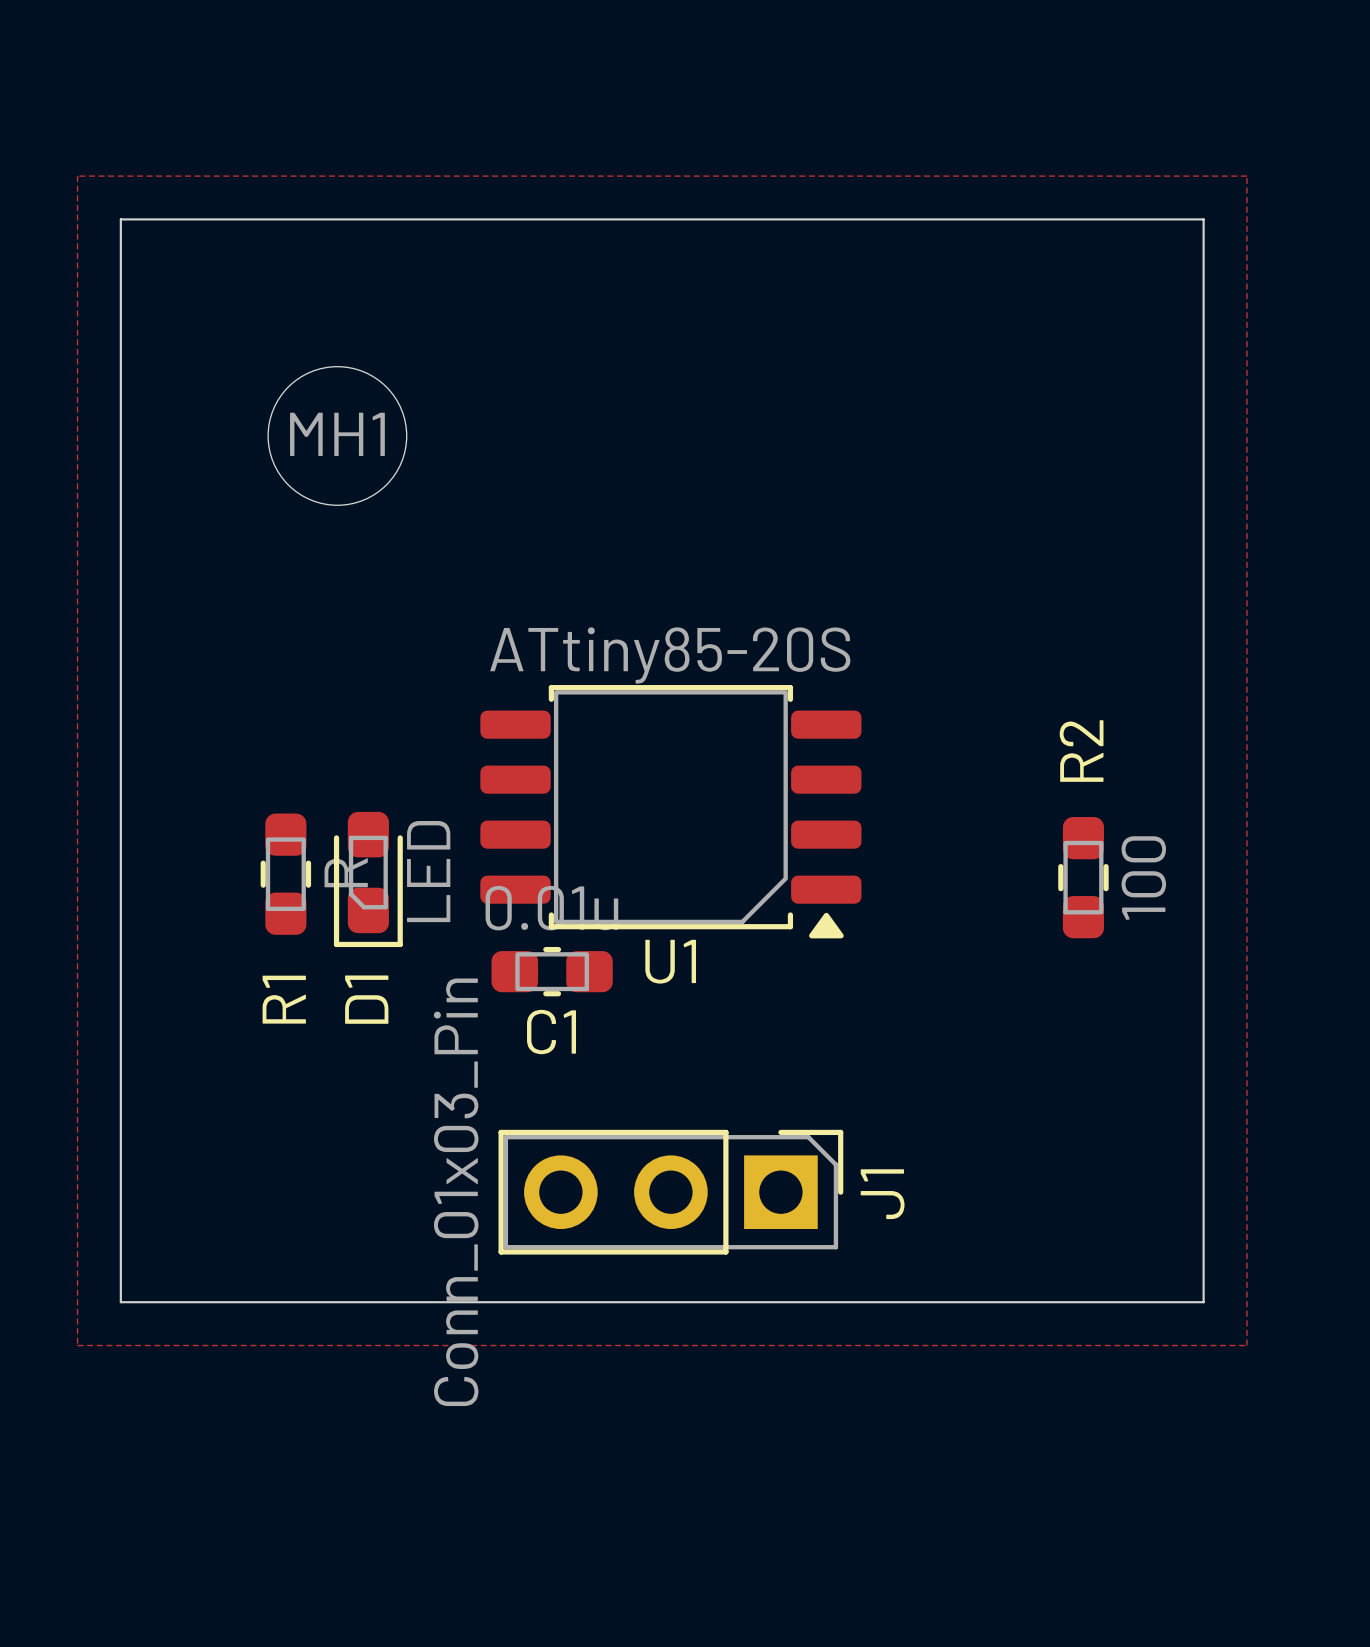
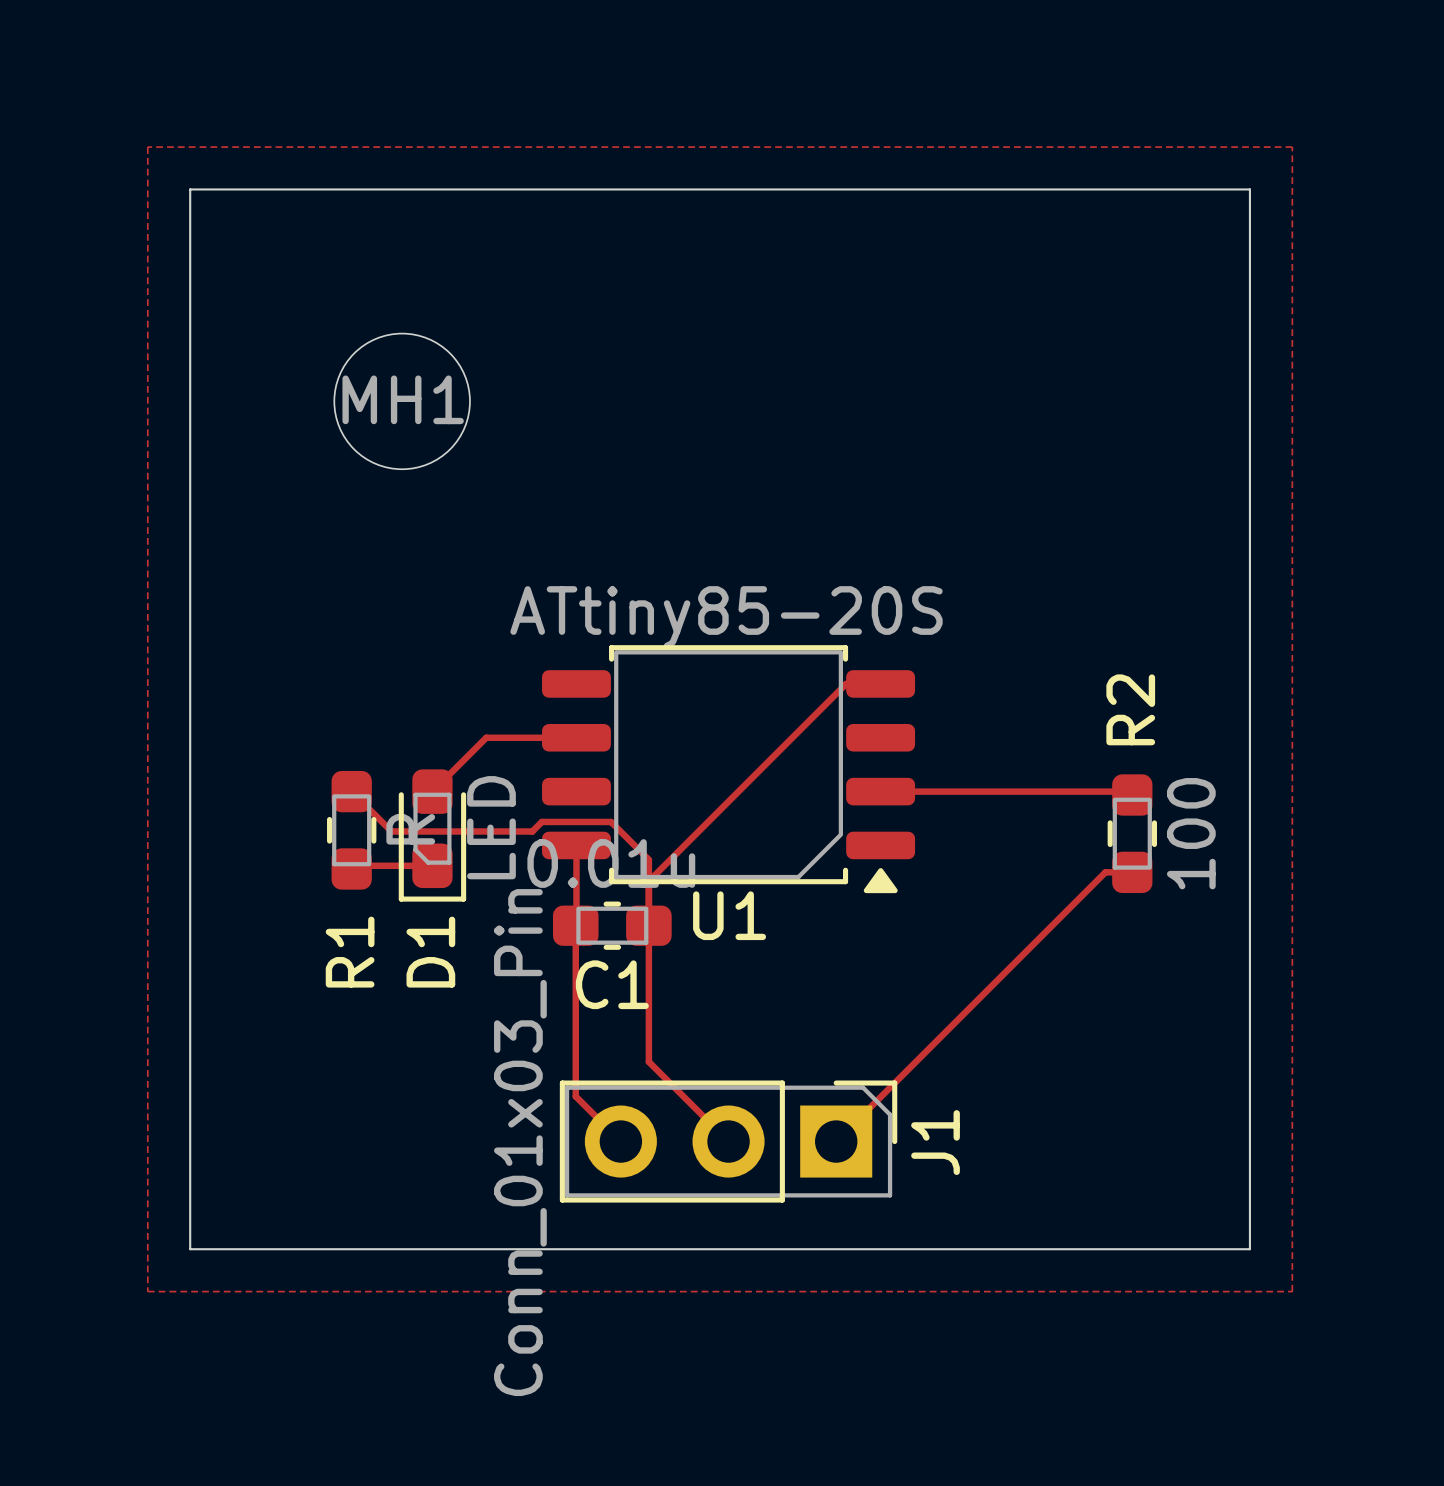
track: none -> (880, 683) (846, 683) (648, 881)
track: none -> (576, 737) (486, 737) (432, 791)
track: none -> (351, 791) (391, 831) (532, 831) (541, 821) (611, 821) (648, 859) (648, 1061) (728, 1141)
track: none -> (880, 791) (1128, 791) (1132, 795)
track: none -> (576, 845) (575, 1096) (620, 1141)
track: none -> (432, 865) (354, 865) (351, 868)
track: none -> (1132, 872) (1105, 872) (836, 1141)

